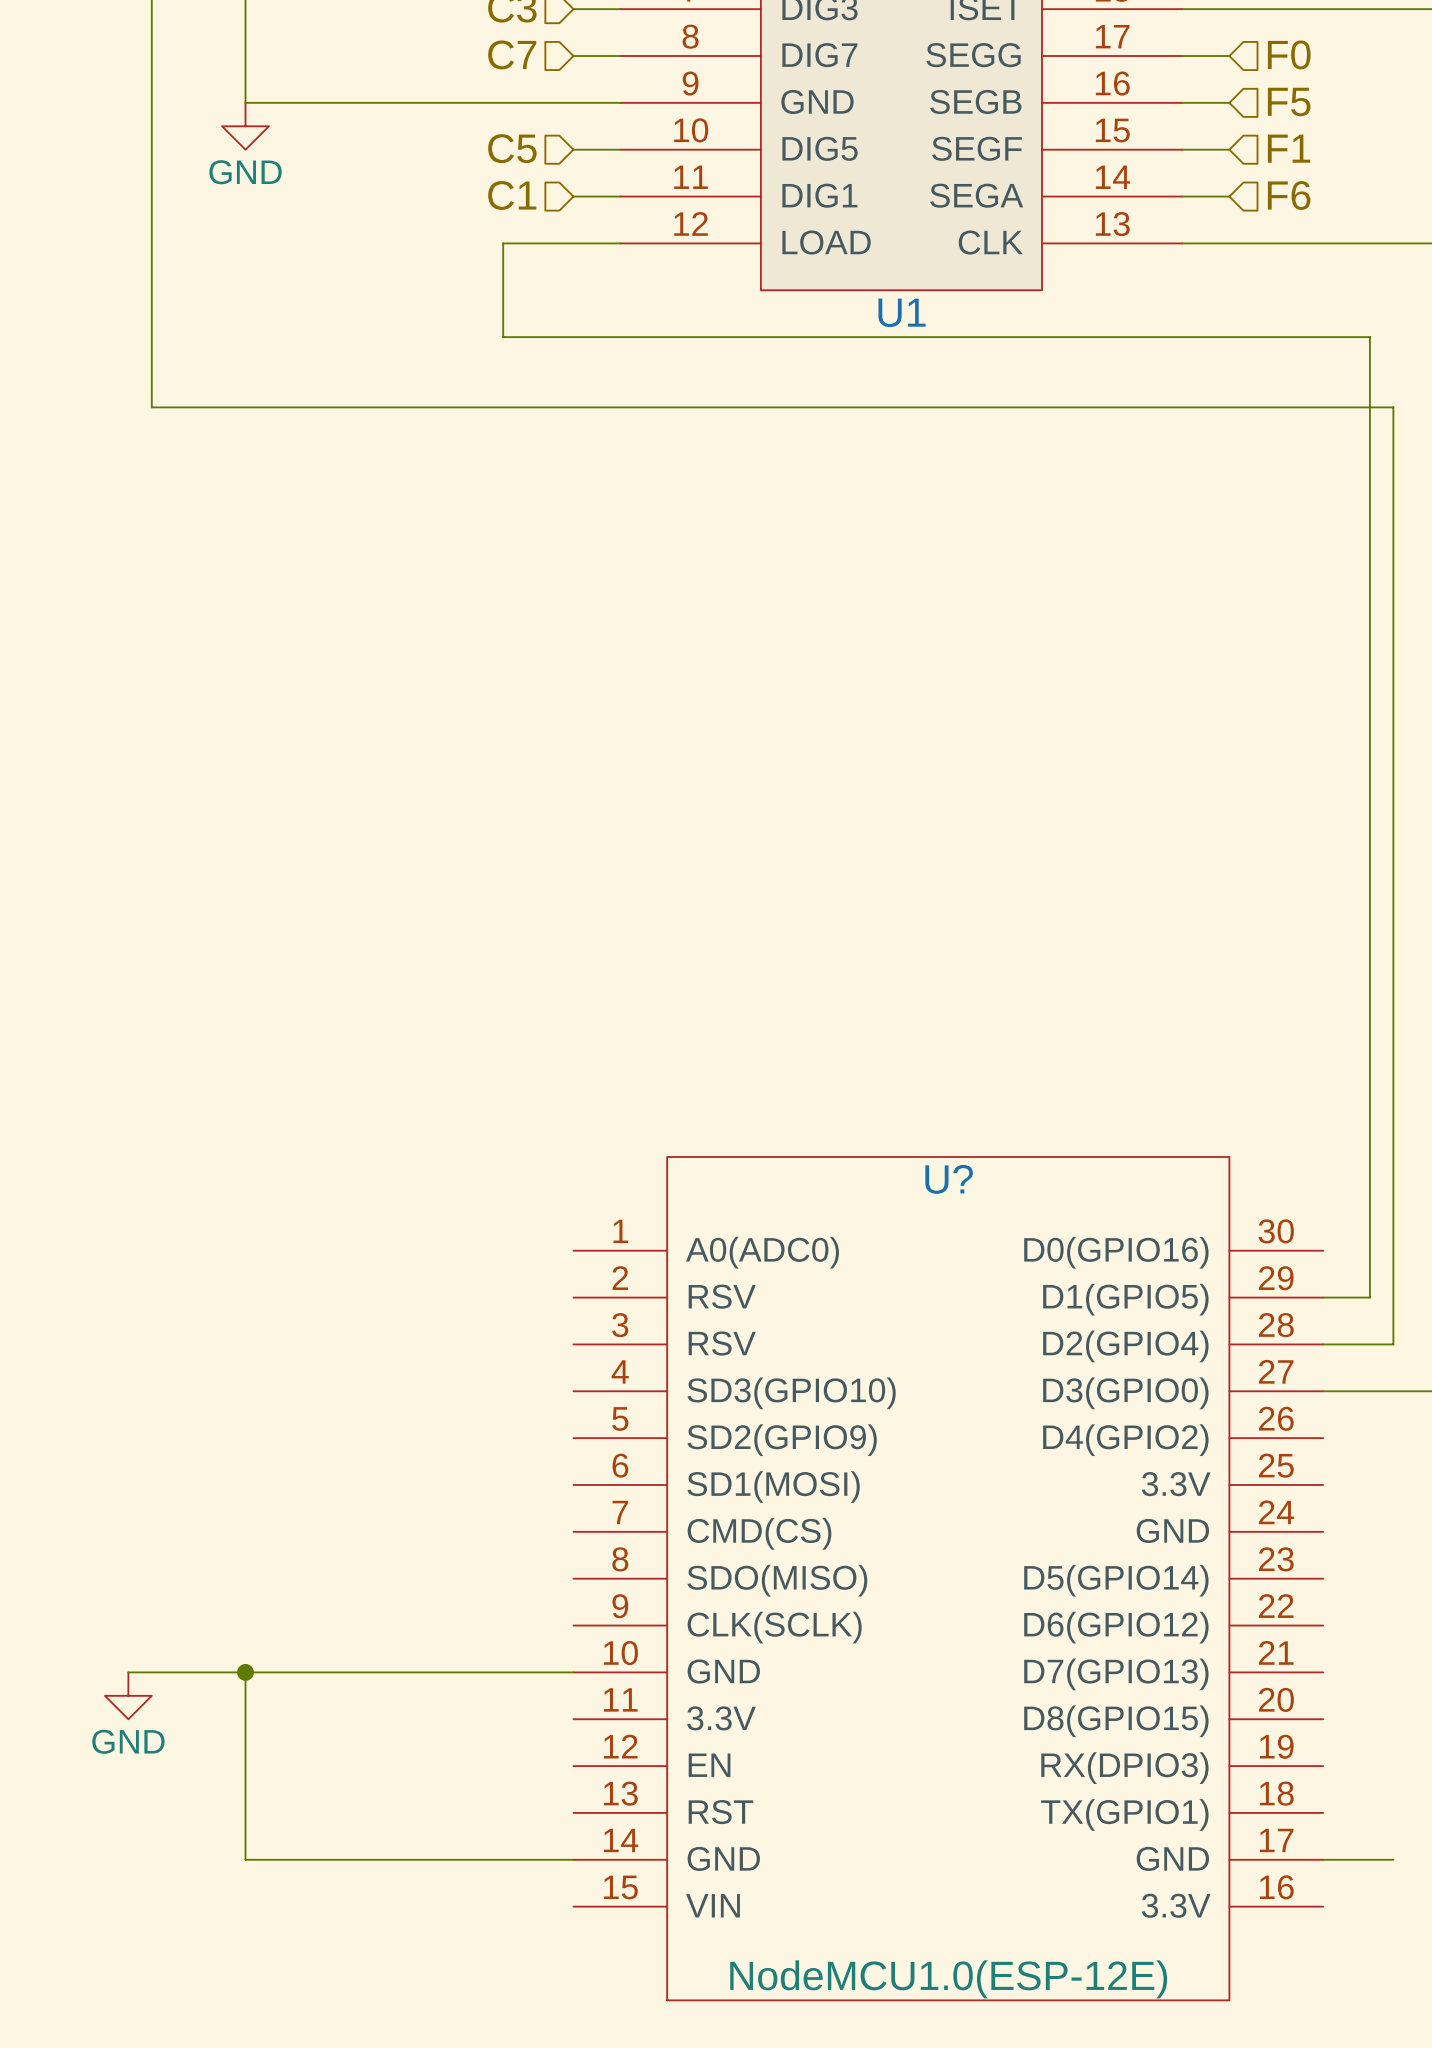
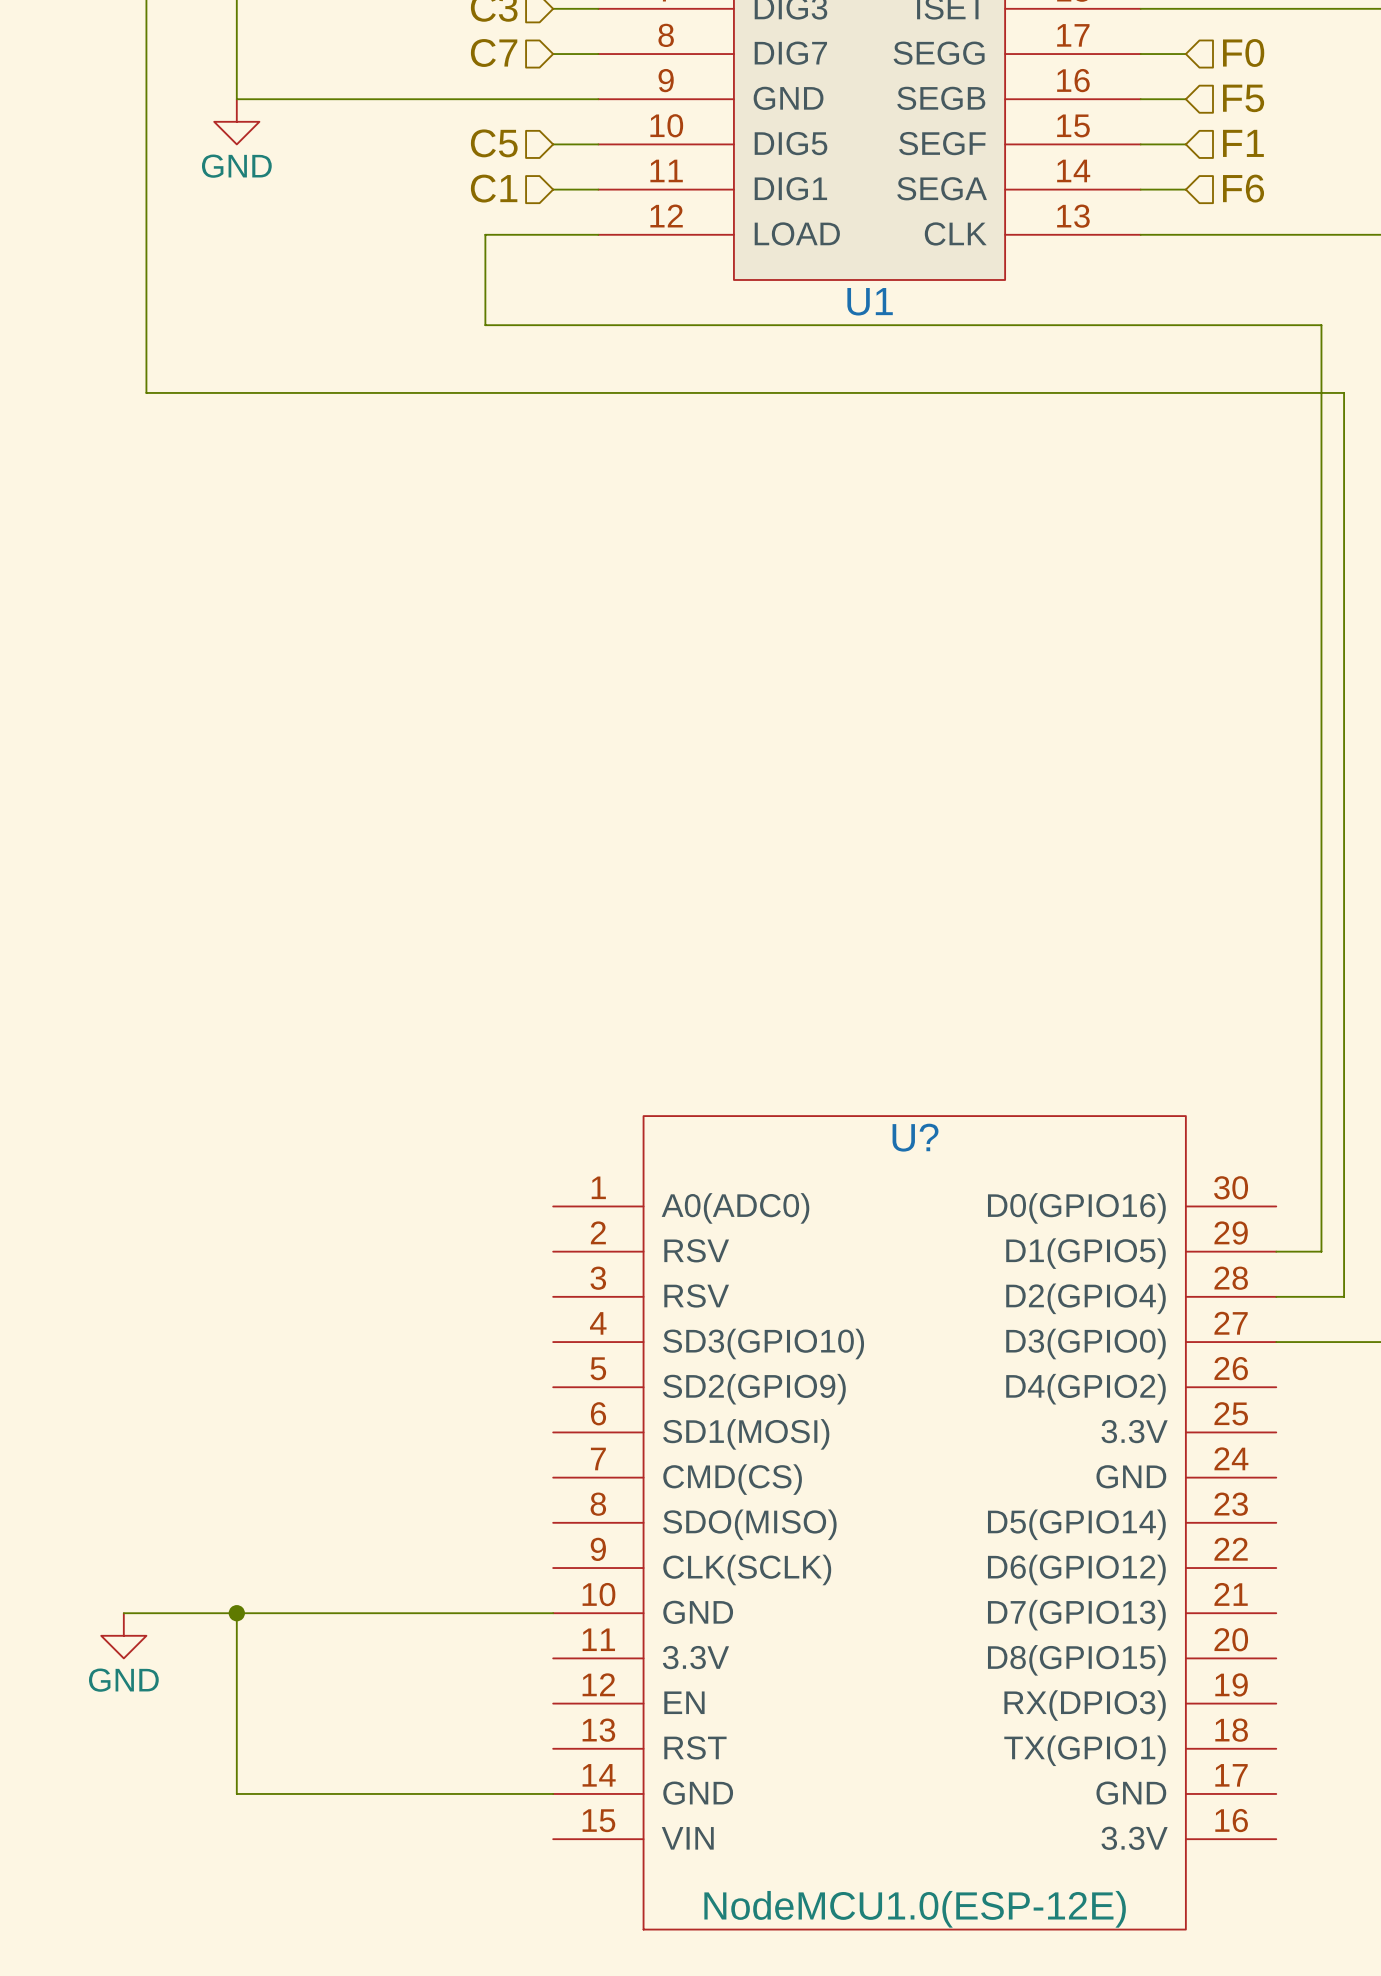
wire: (1323, 1859) (1393, 1859) -> none

